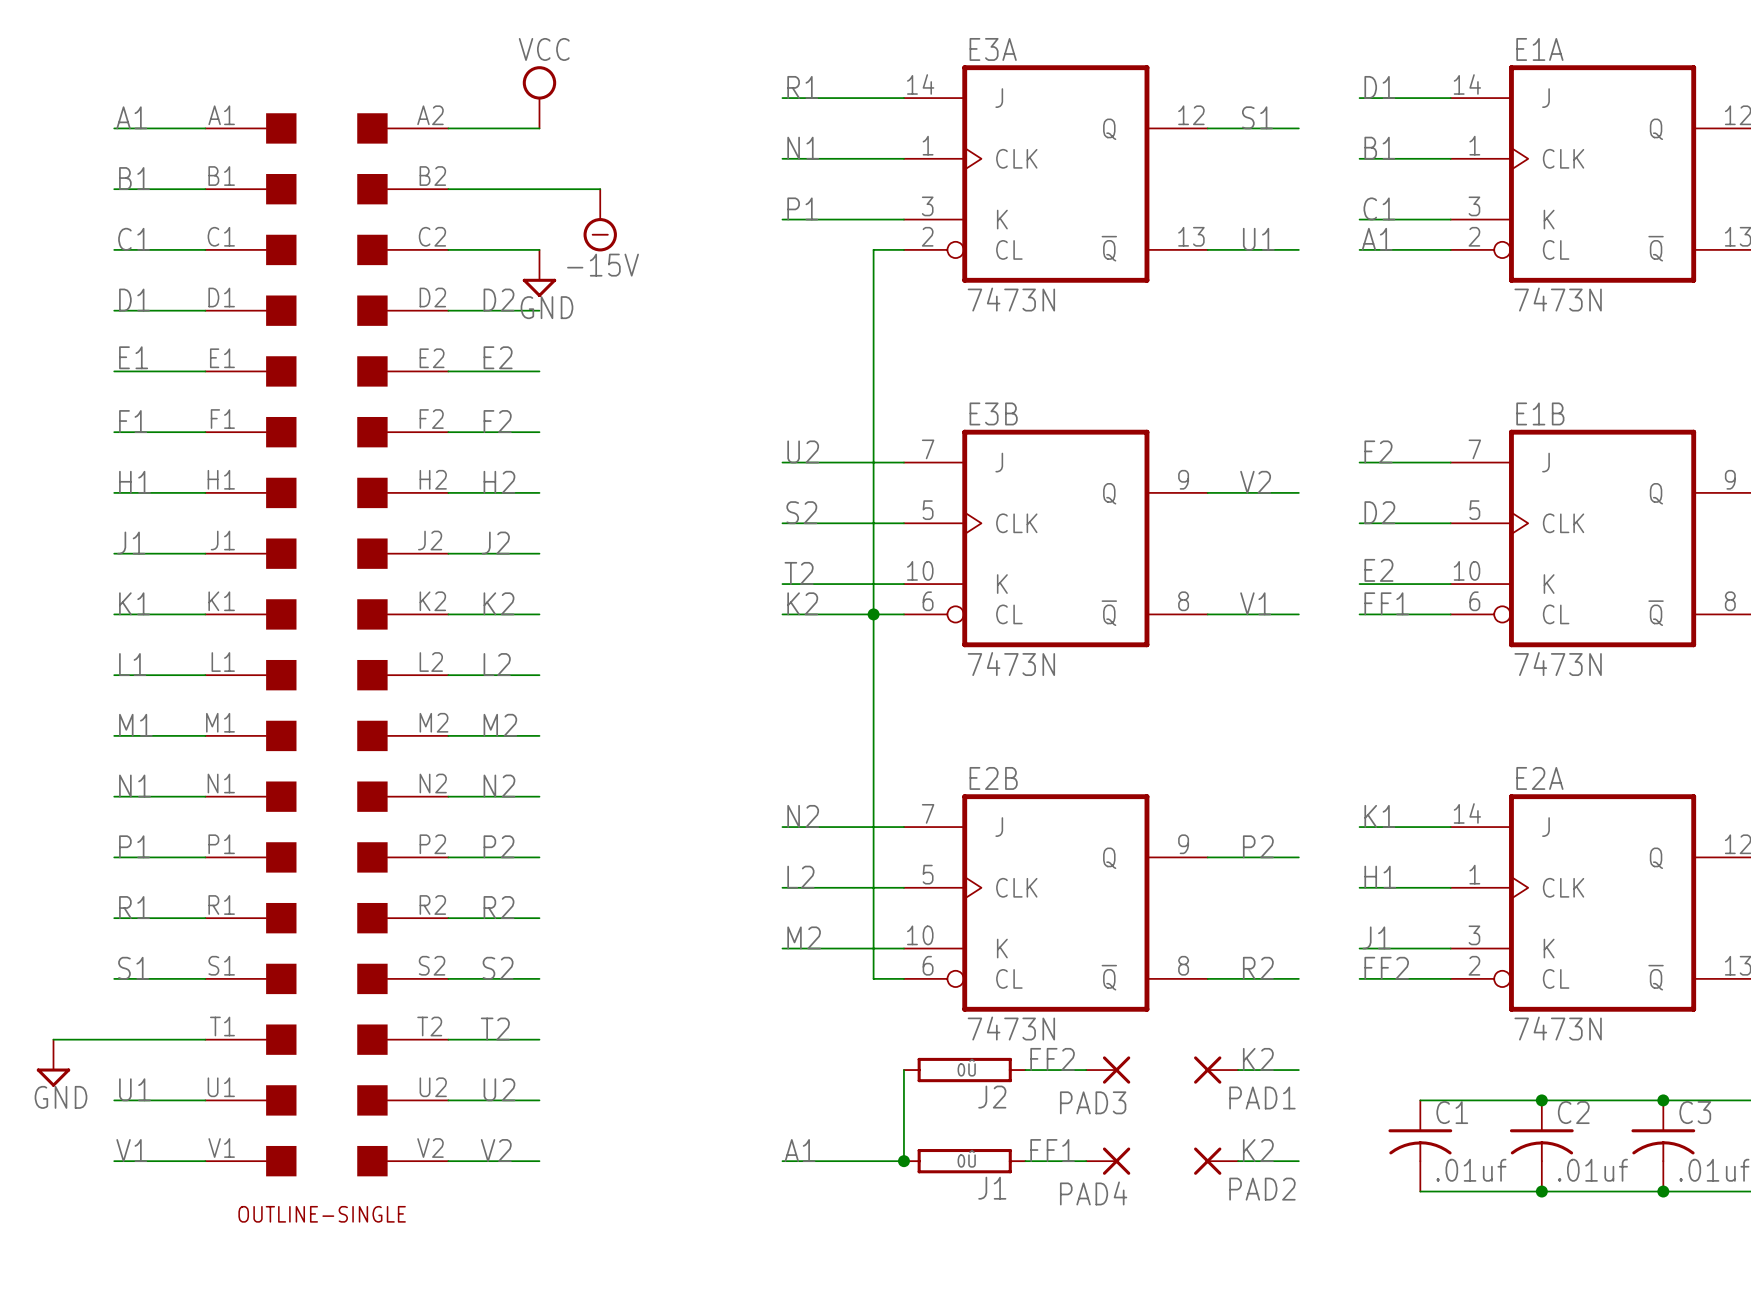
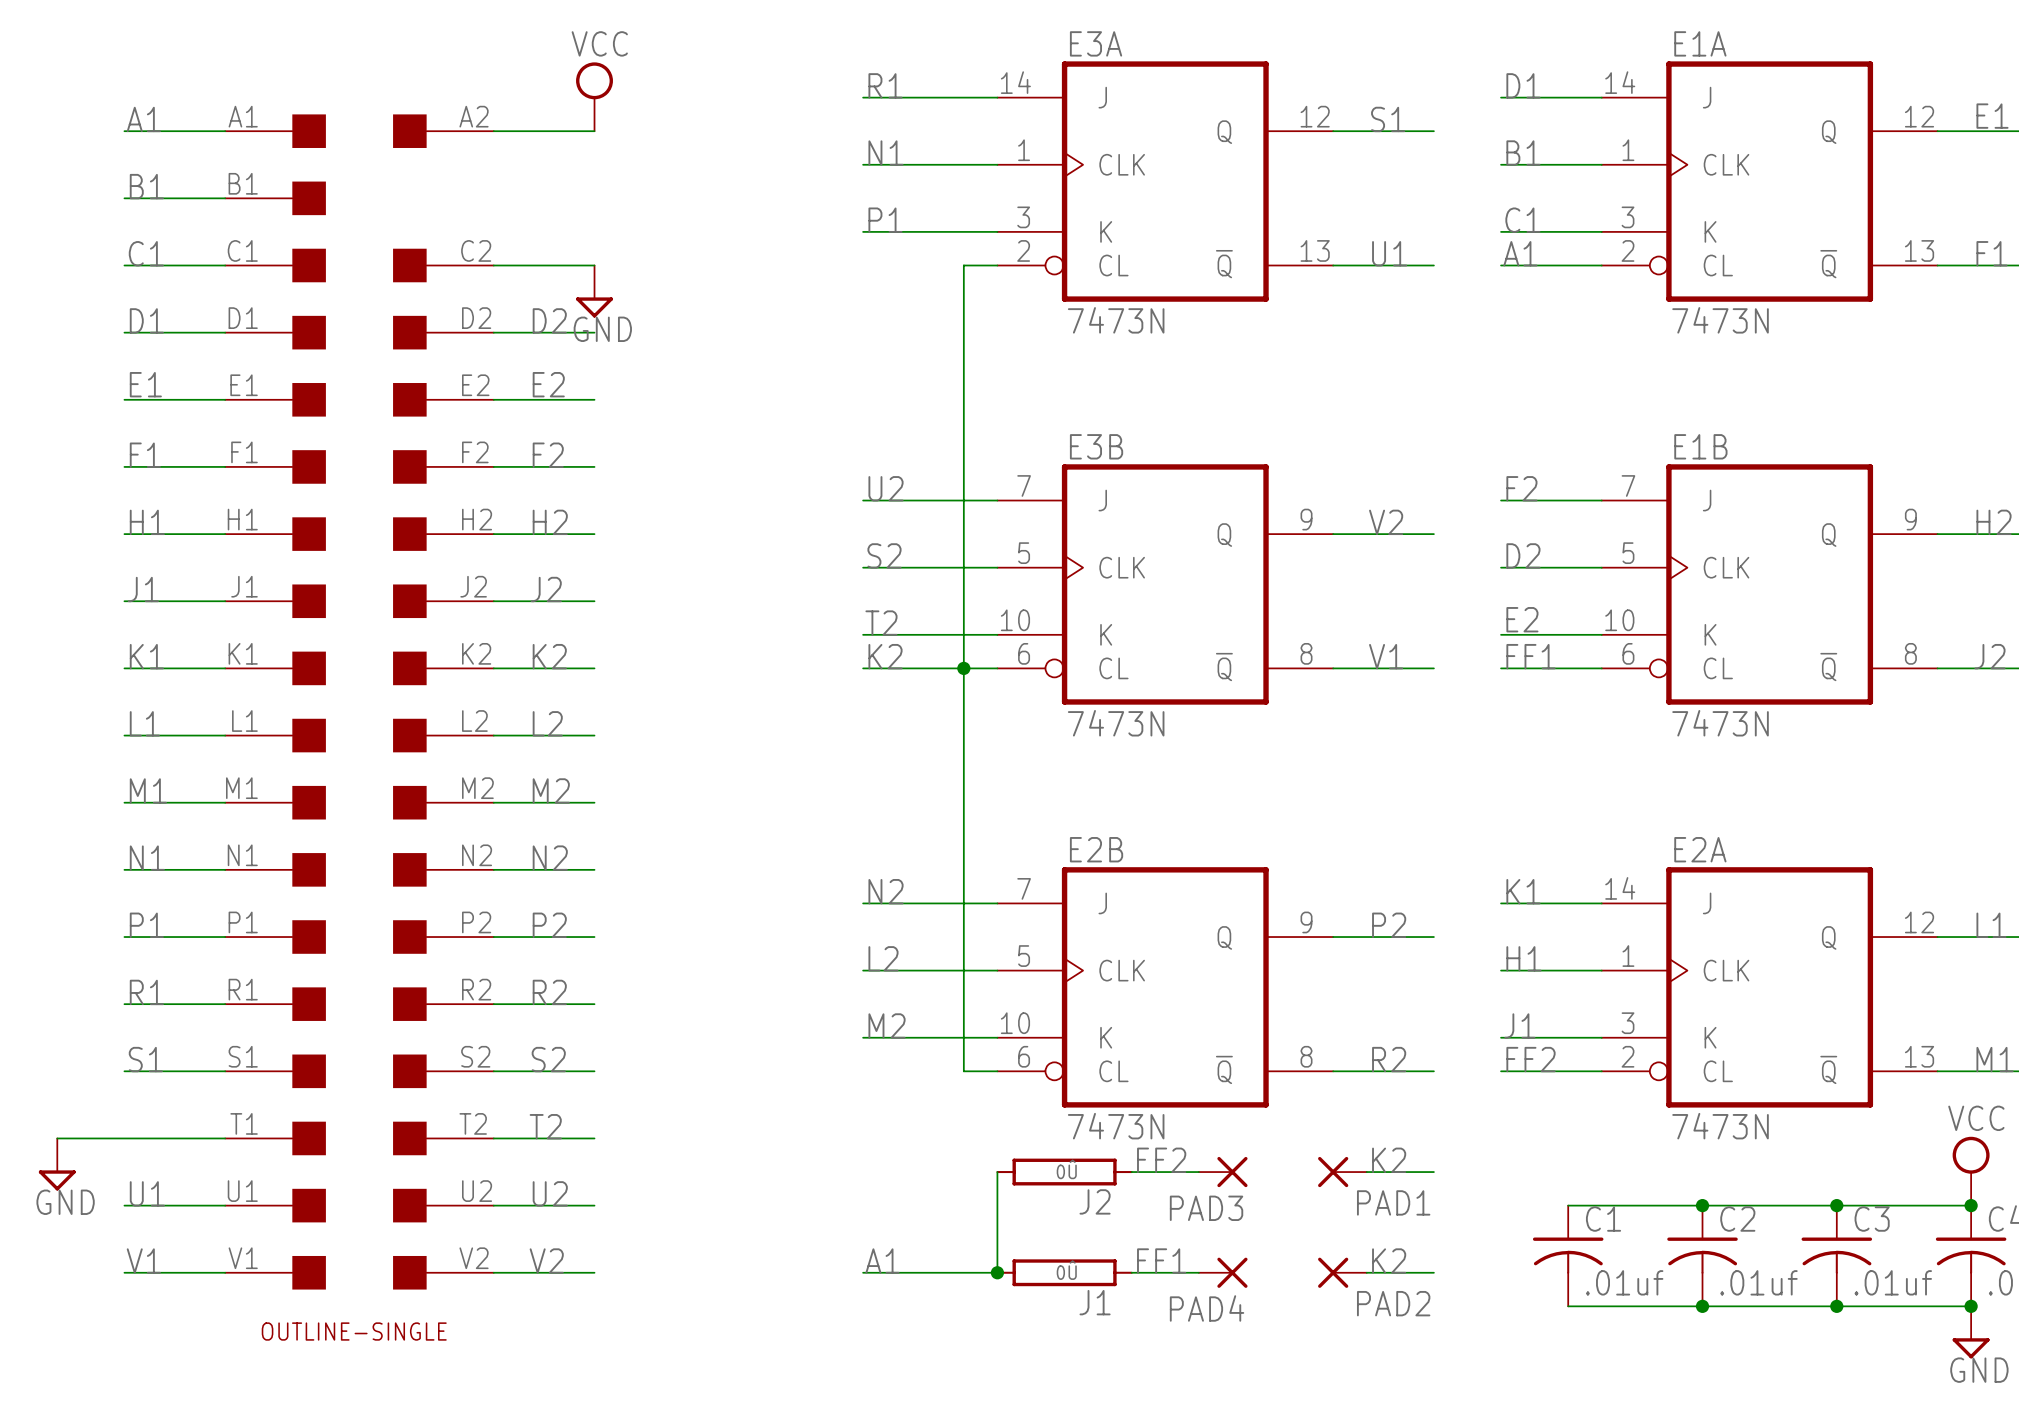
part: (402, 189) -> none
wire: (448, 189) (600, 189) -> none
power symbol: -15V (600, 220) -> none

